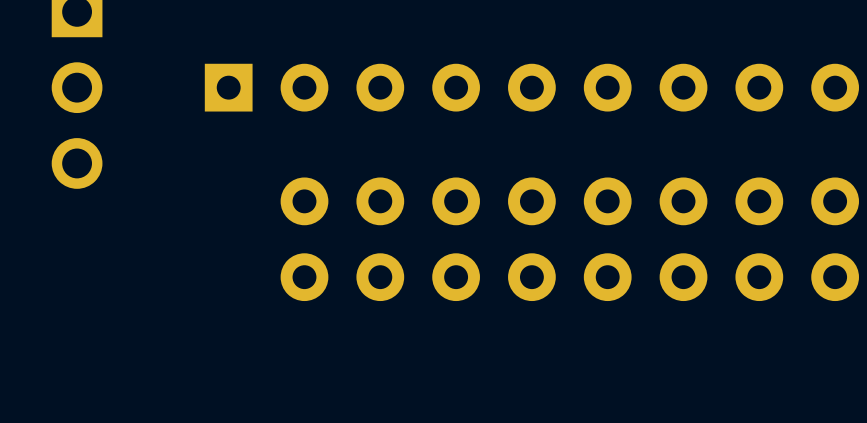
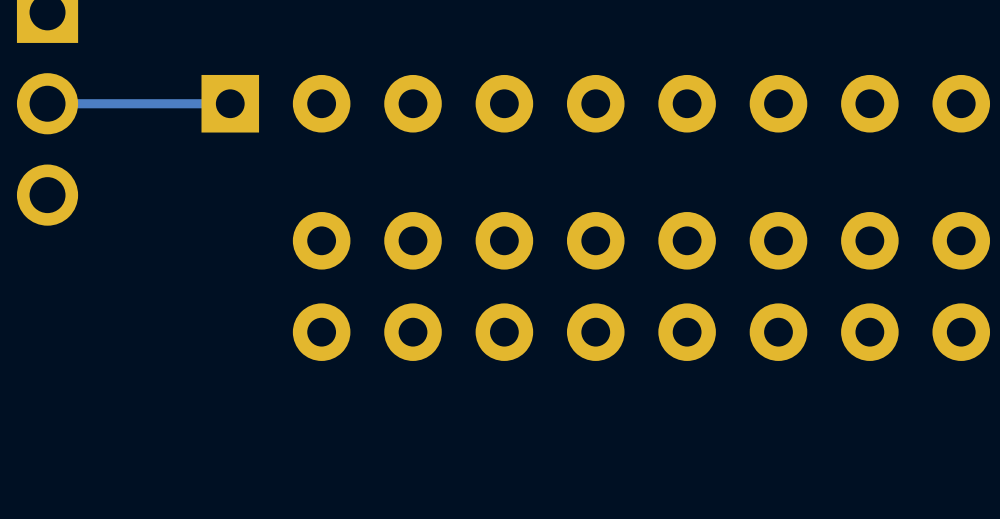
track: none -> (230, 103) (47, 103)

